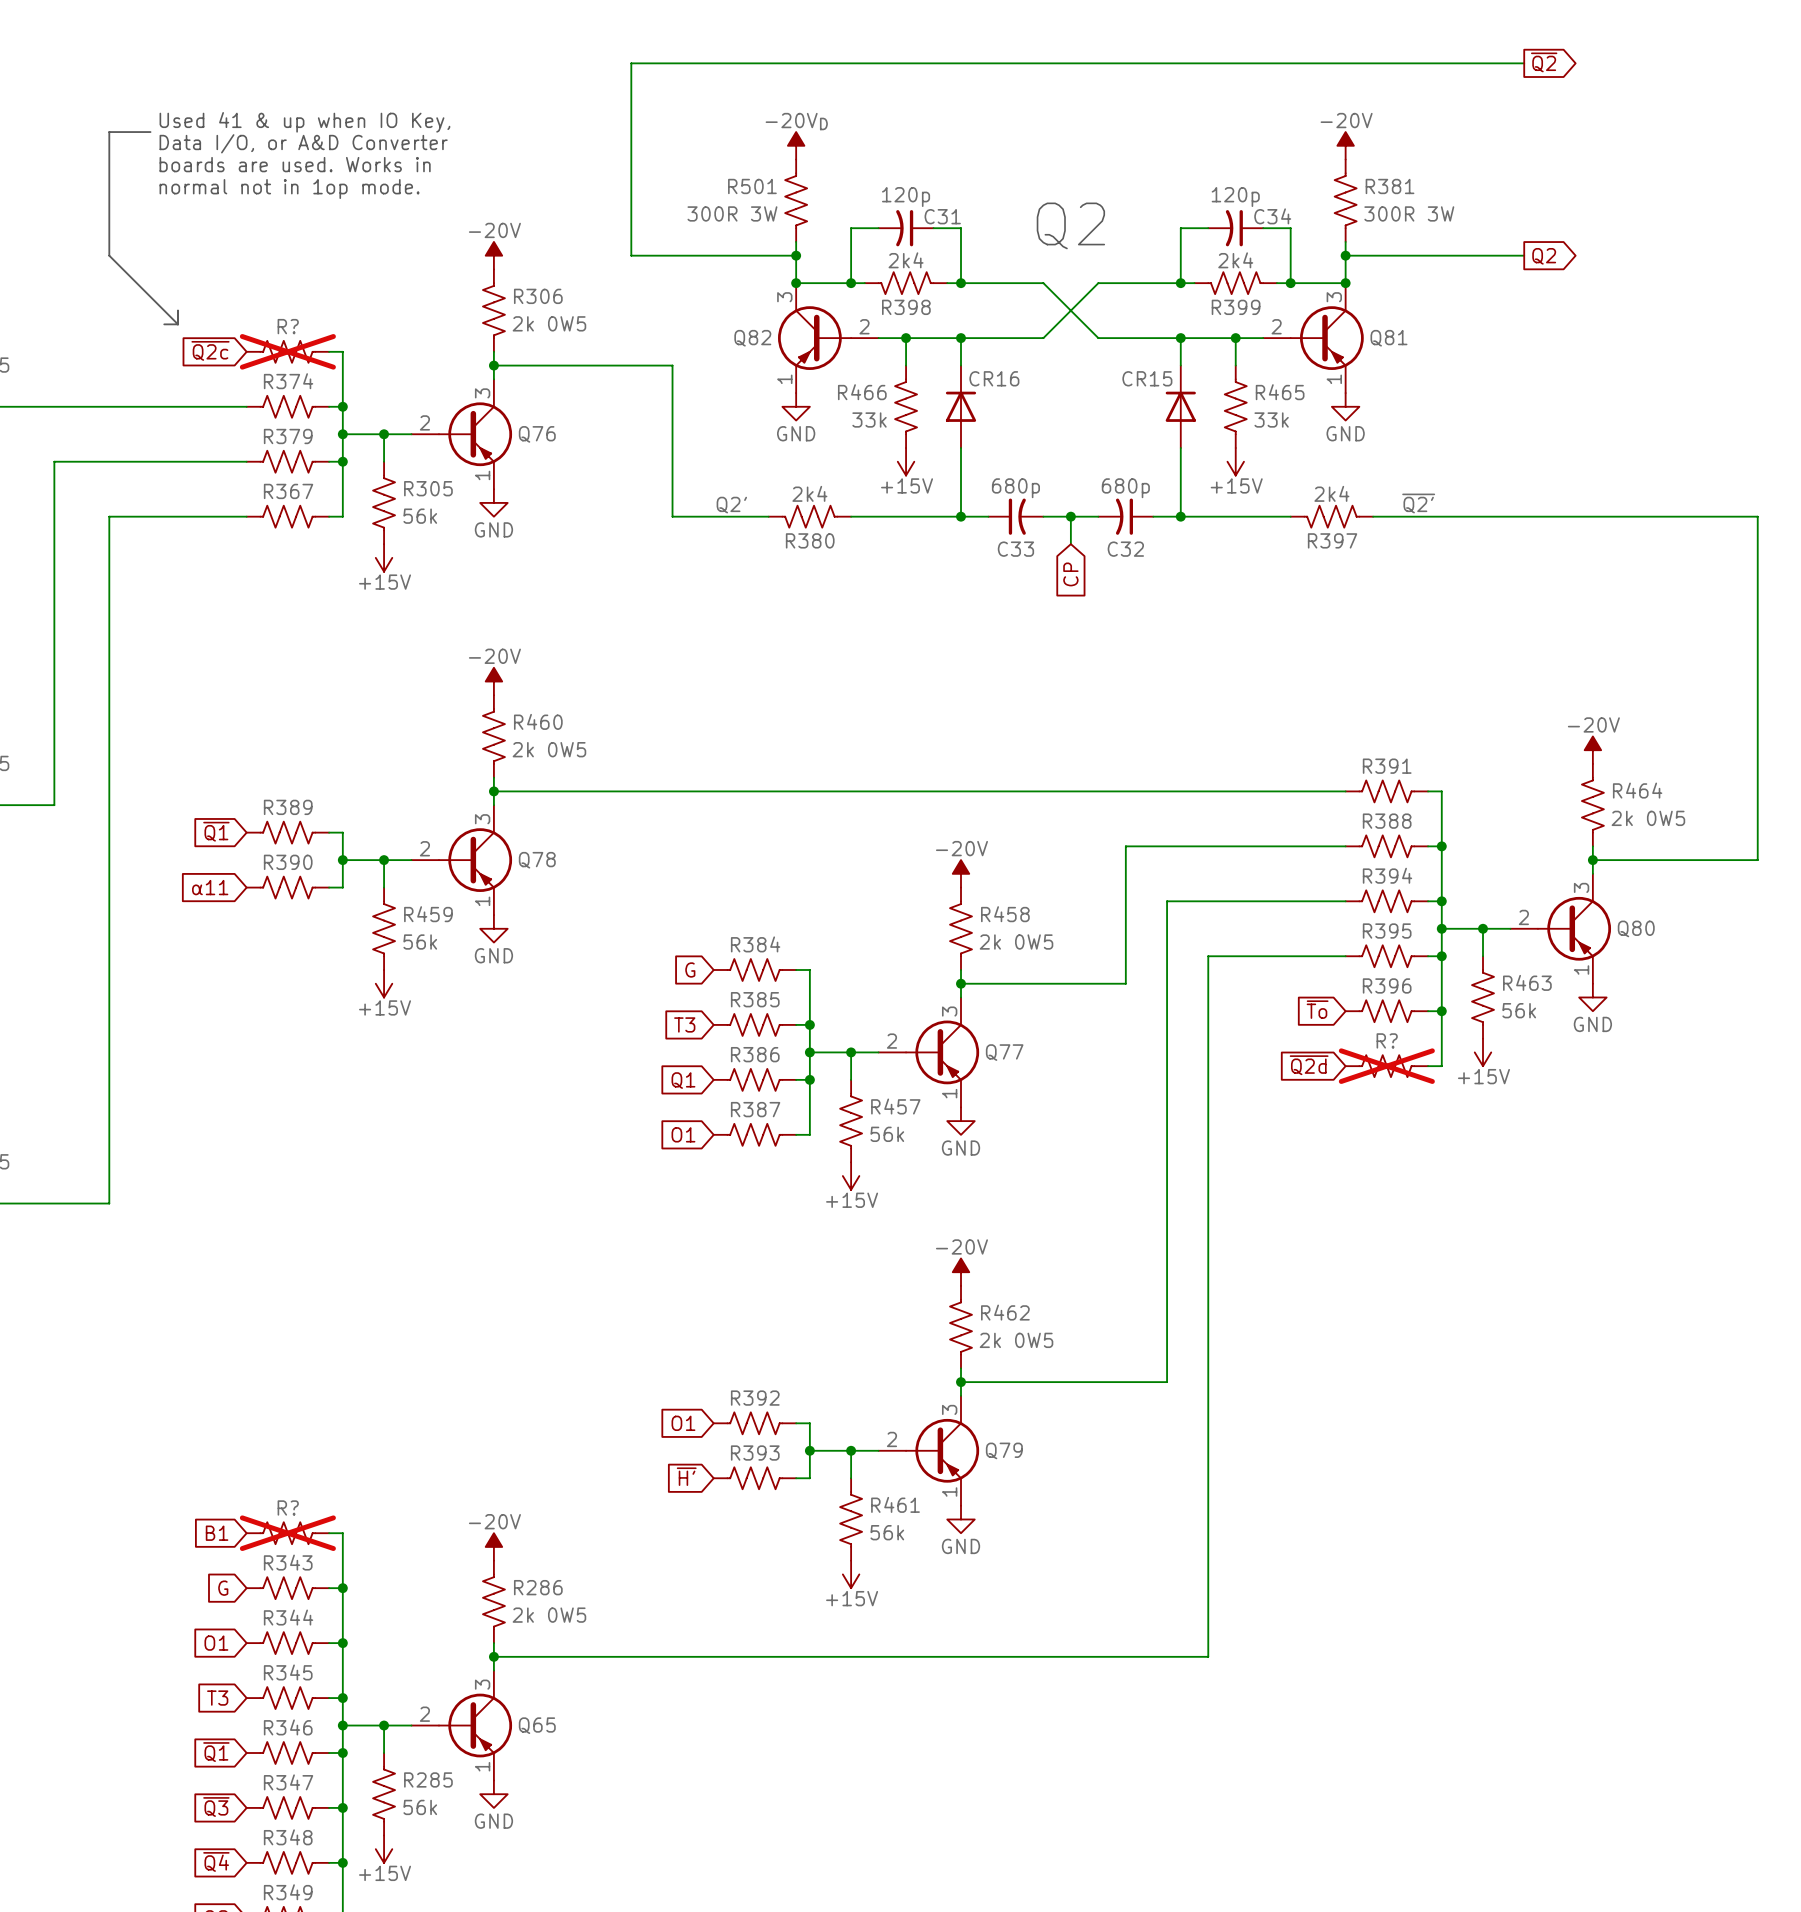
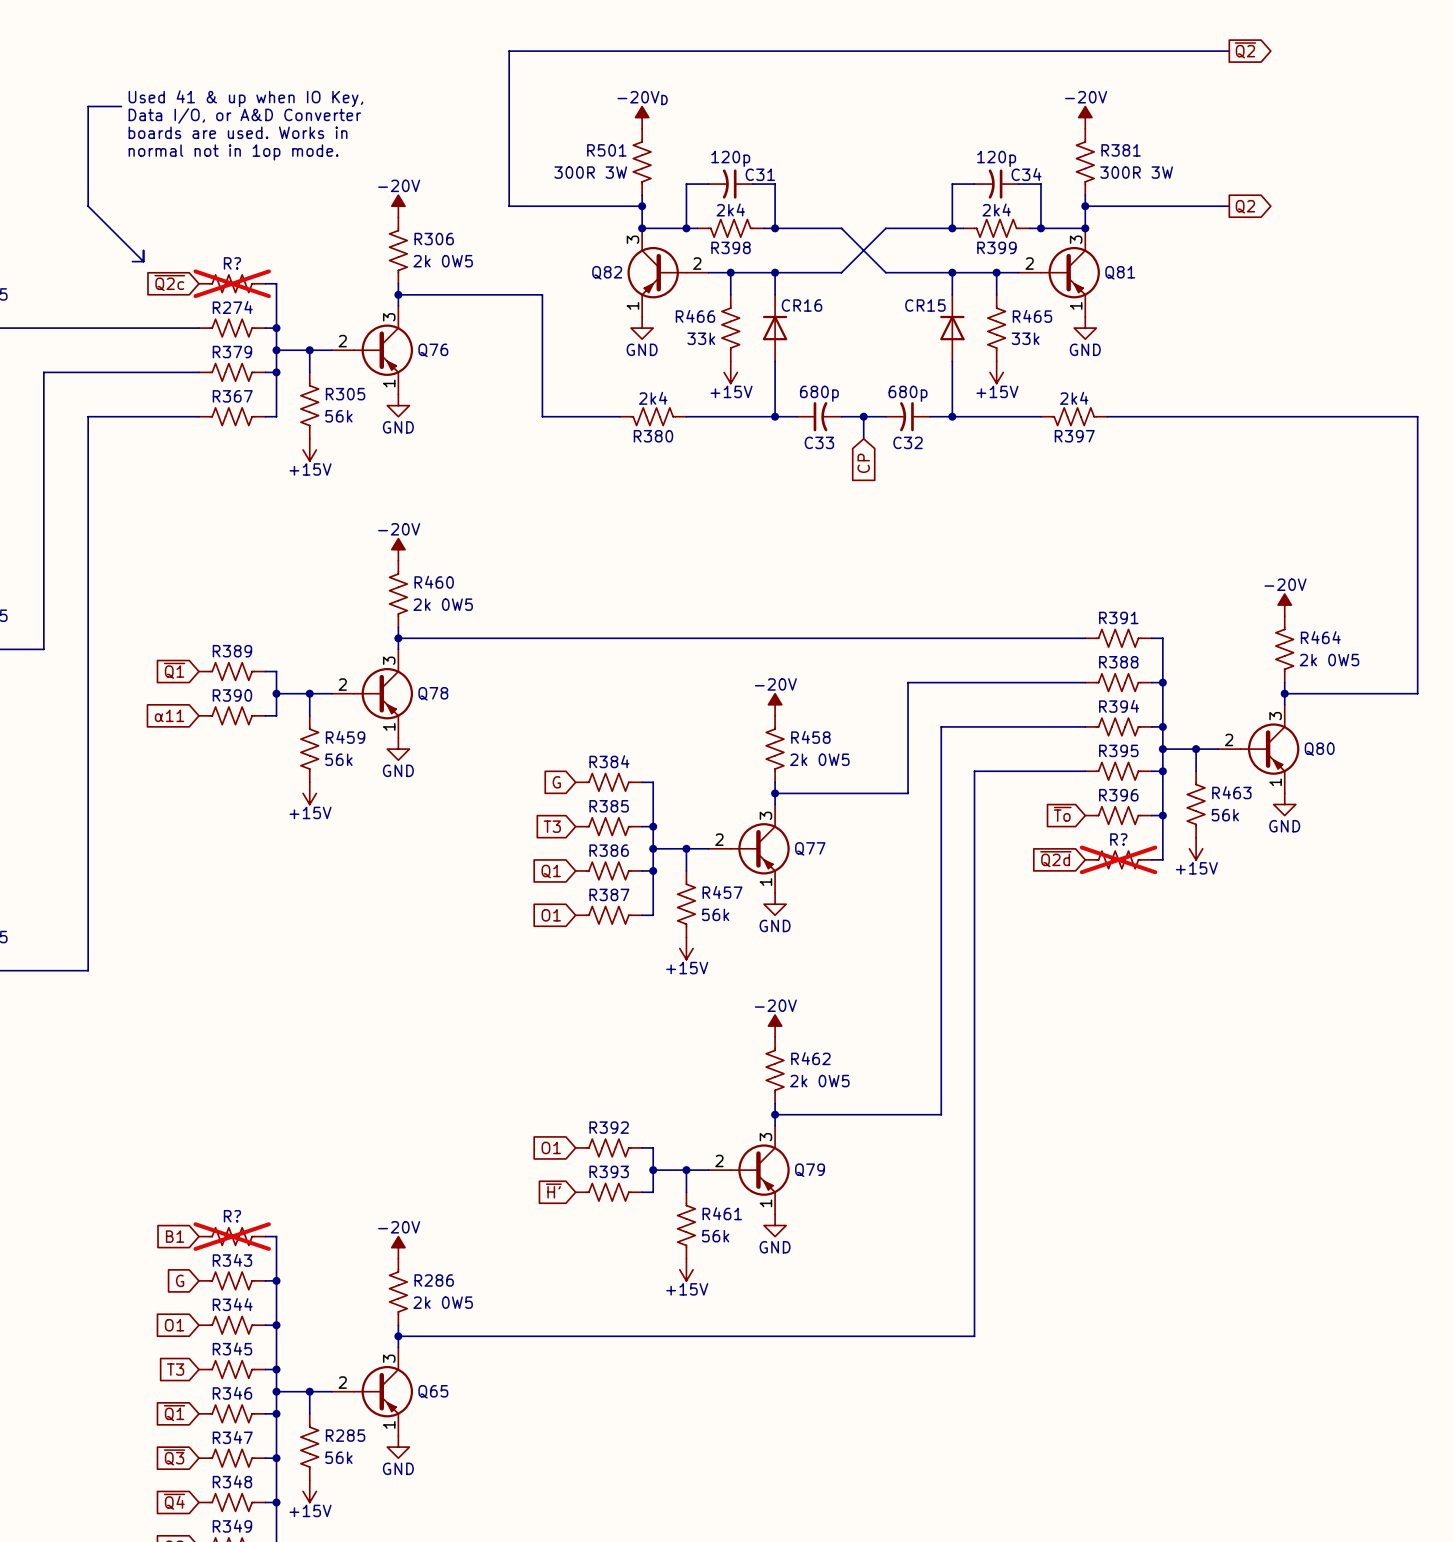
text: Q2 (1070, 225) -> none
R374 name: R374 (288, 381) -> R274 (232, 307)
label: ~{Q2'} (1418, 503) -> none
label: Q2' (731, 505) -> none

